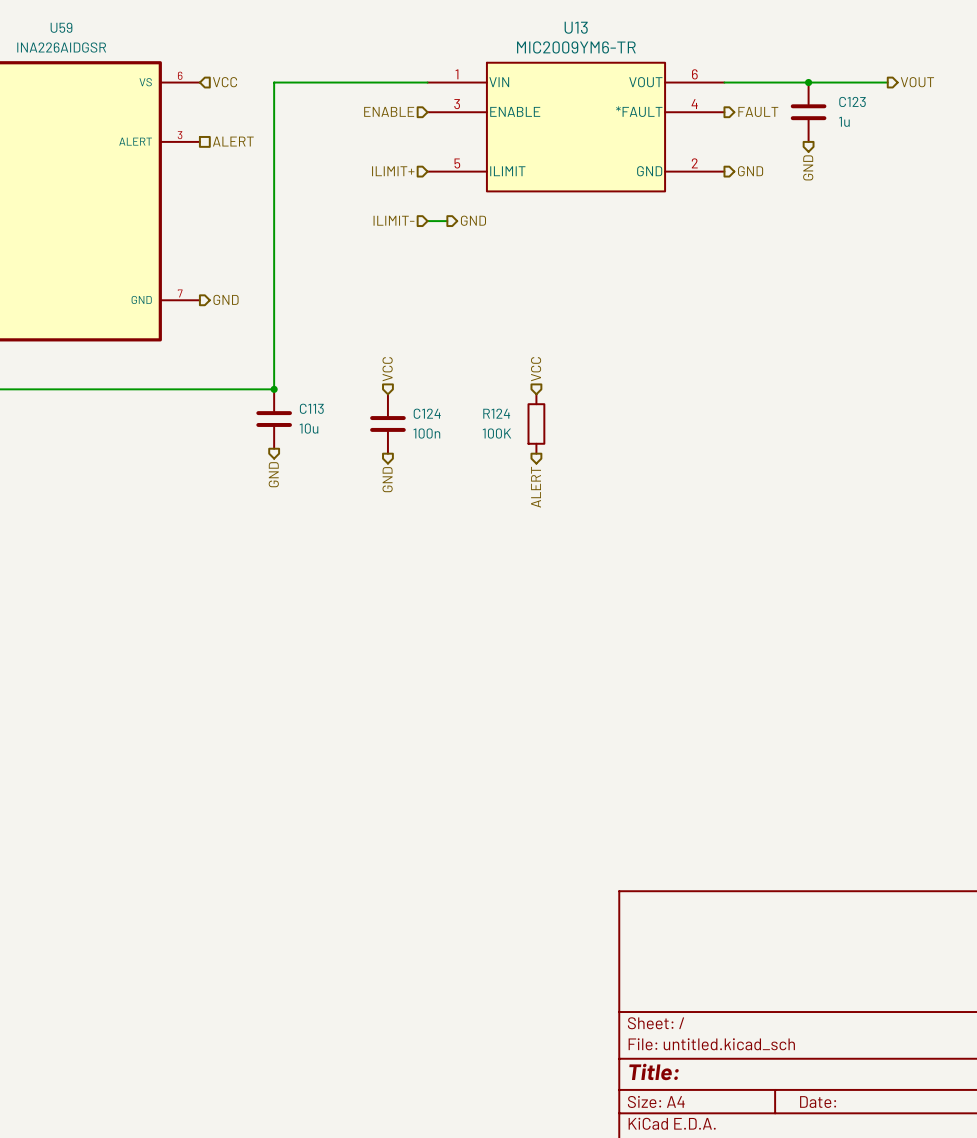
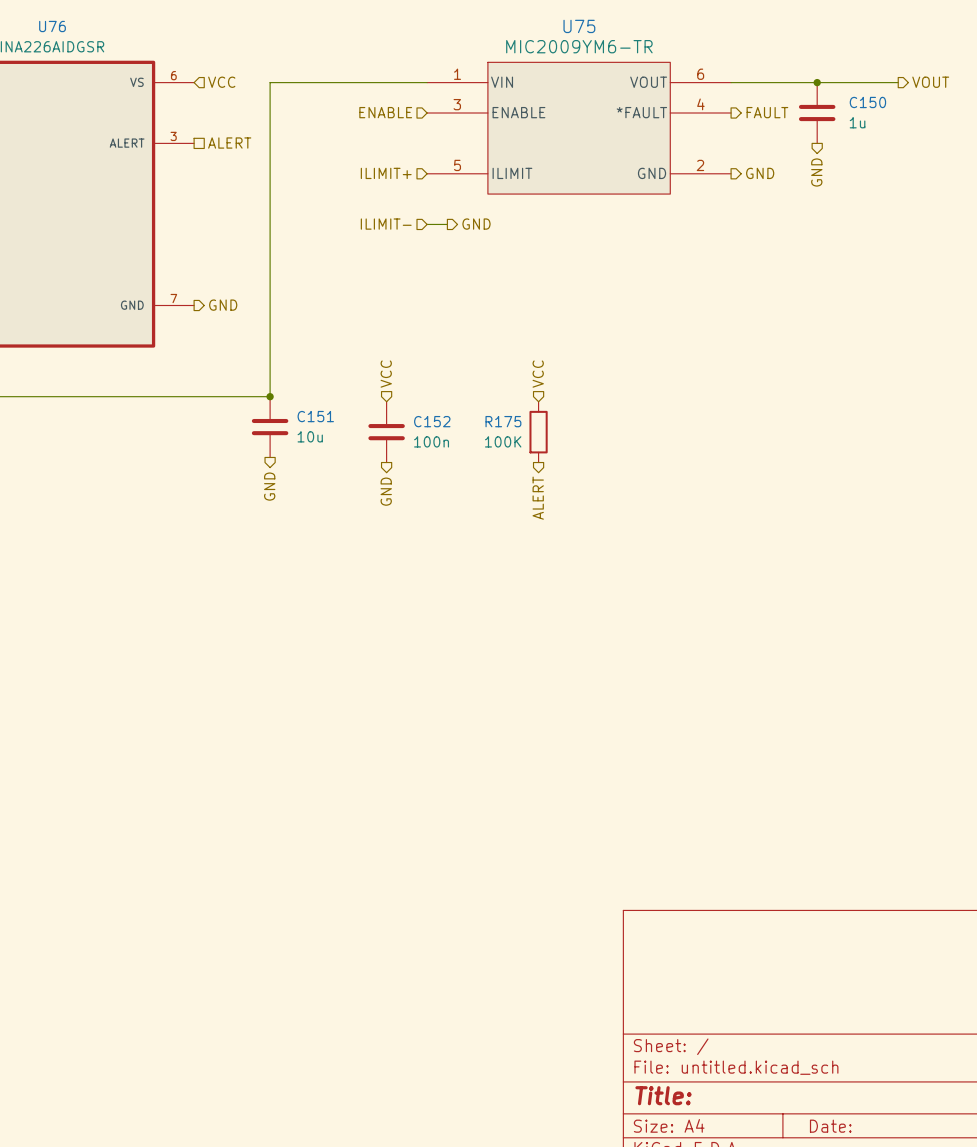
U59 name: U59 (61, 27) -> U76 (52, 26)
U13 name: U13 (576, 27) -> U75 (579, 26)
C123 name: C123 (852, 101) -> C150 (867, 102)
C113 name: C113 (311, 408) -> C151 (315, 416)
C124 name: C124 (427, 413) -> C152 (432, 421)
R124 name: R124 (496, 413) -> R175 (503, 421)

